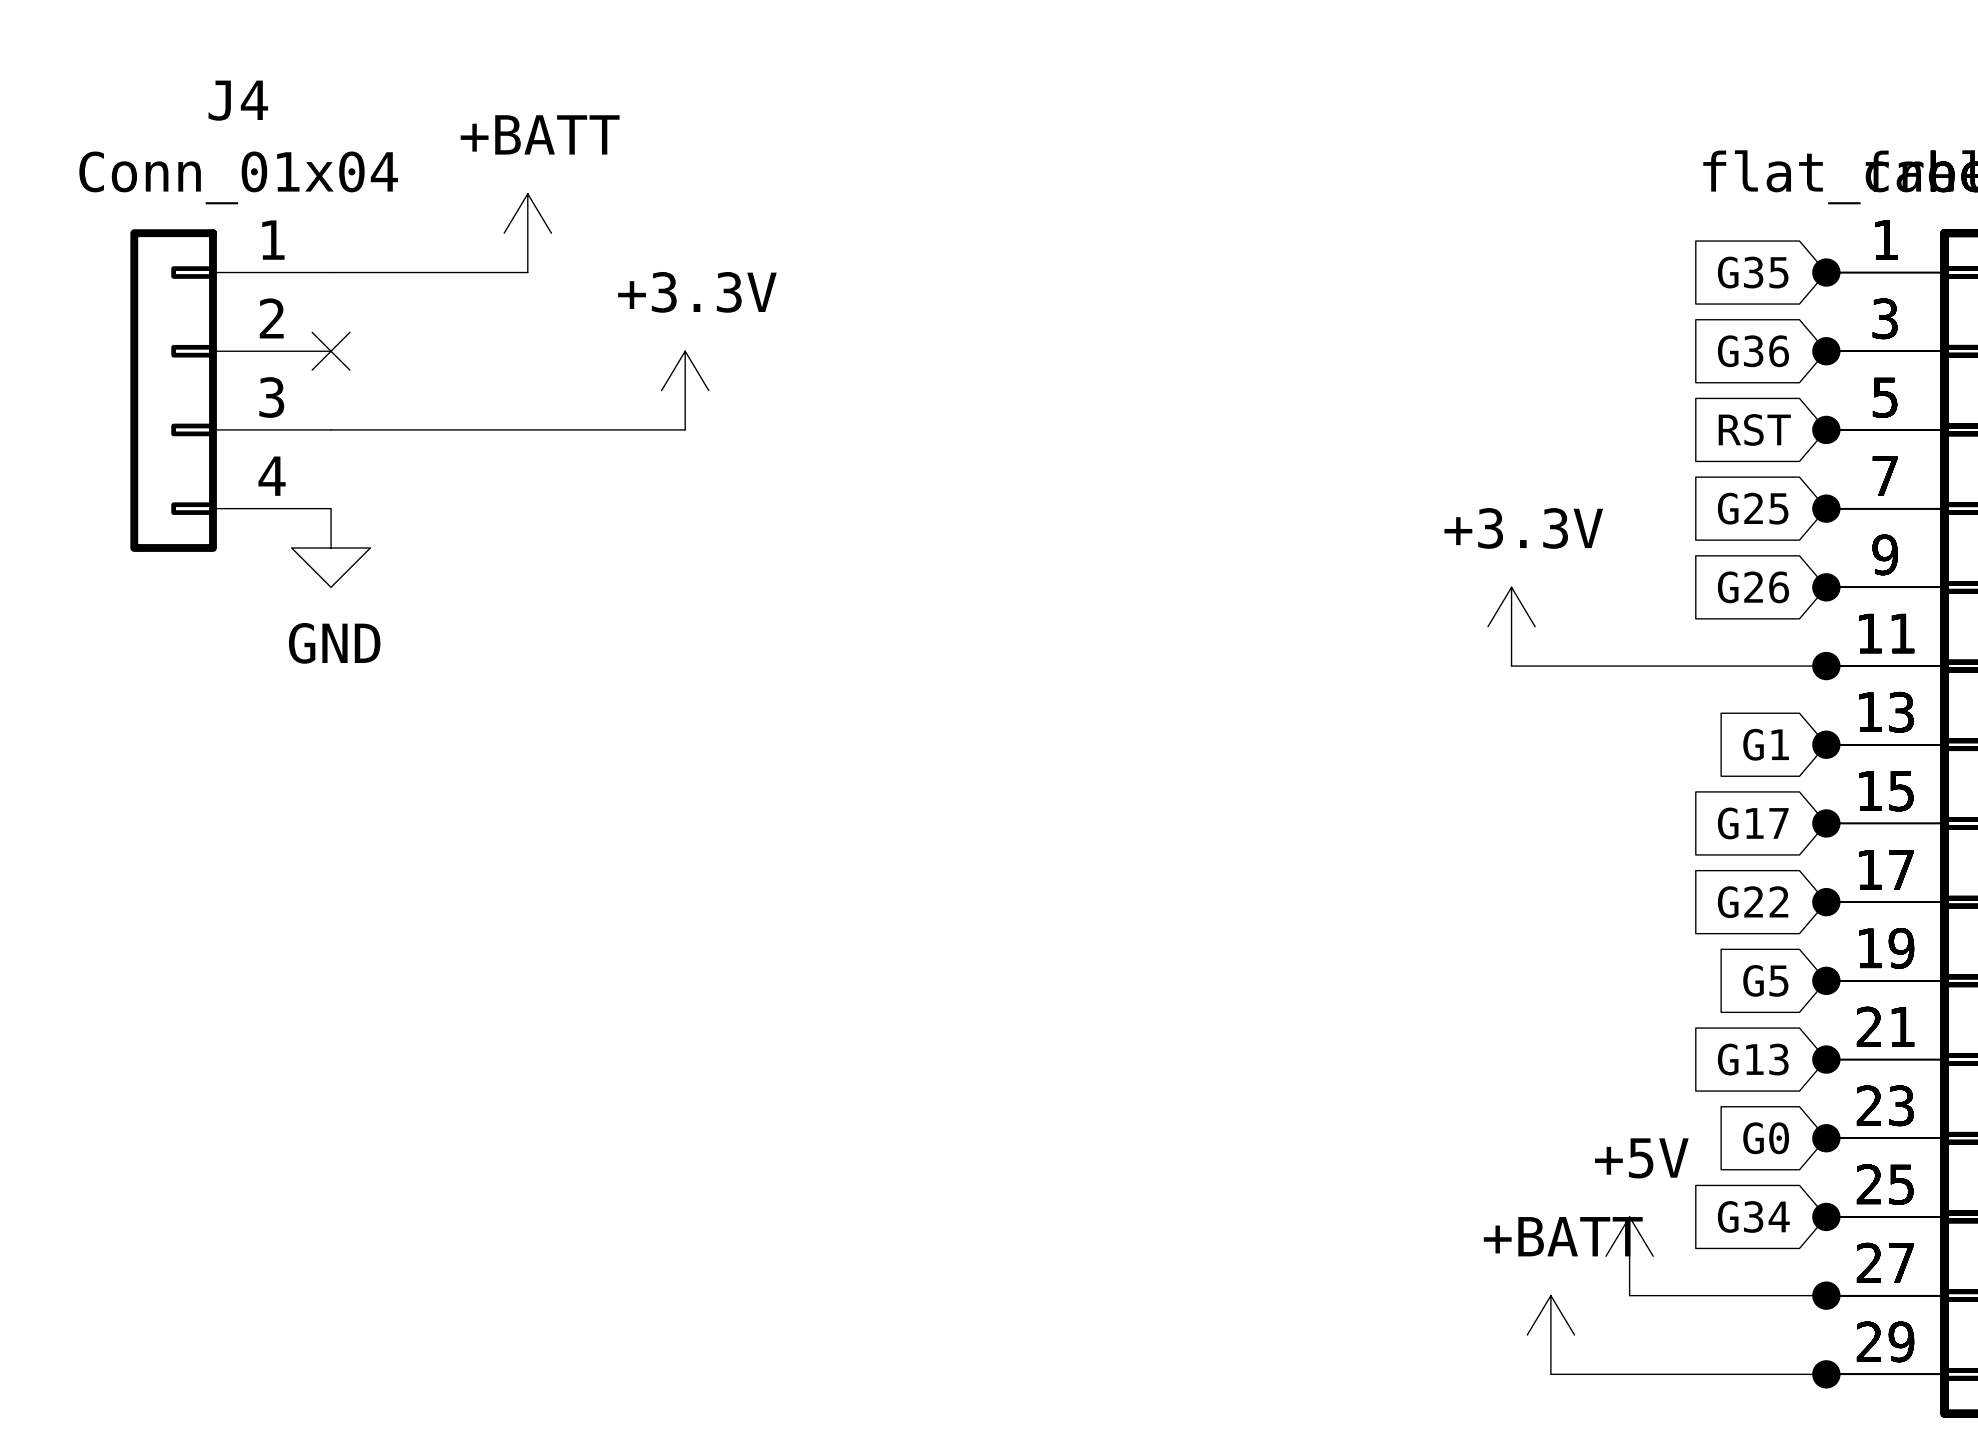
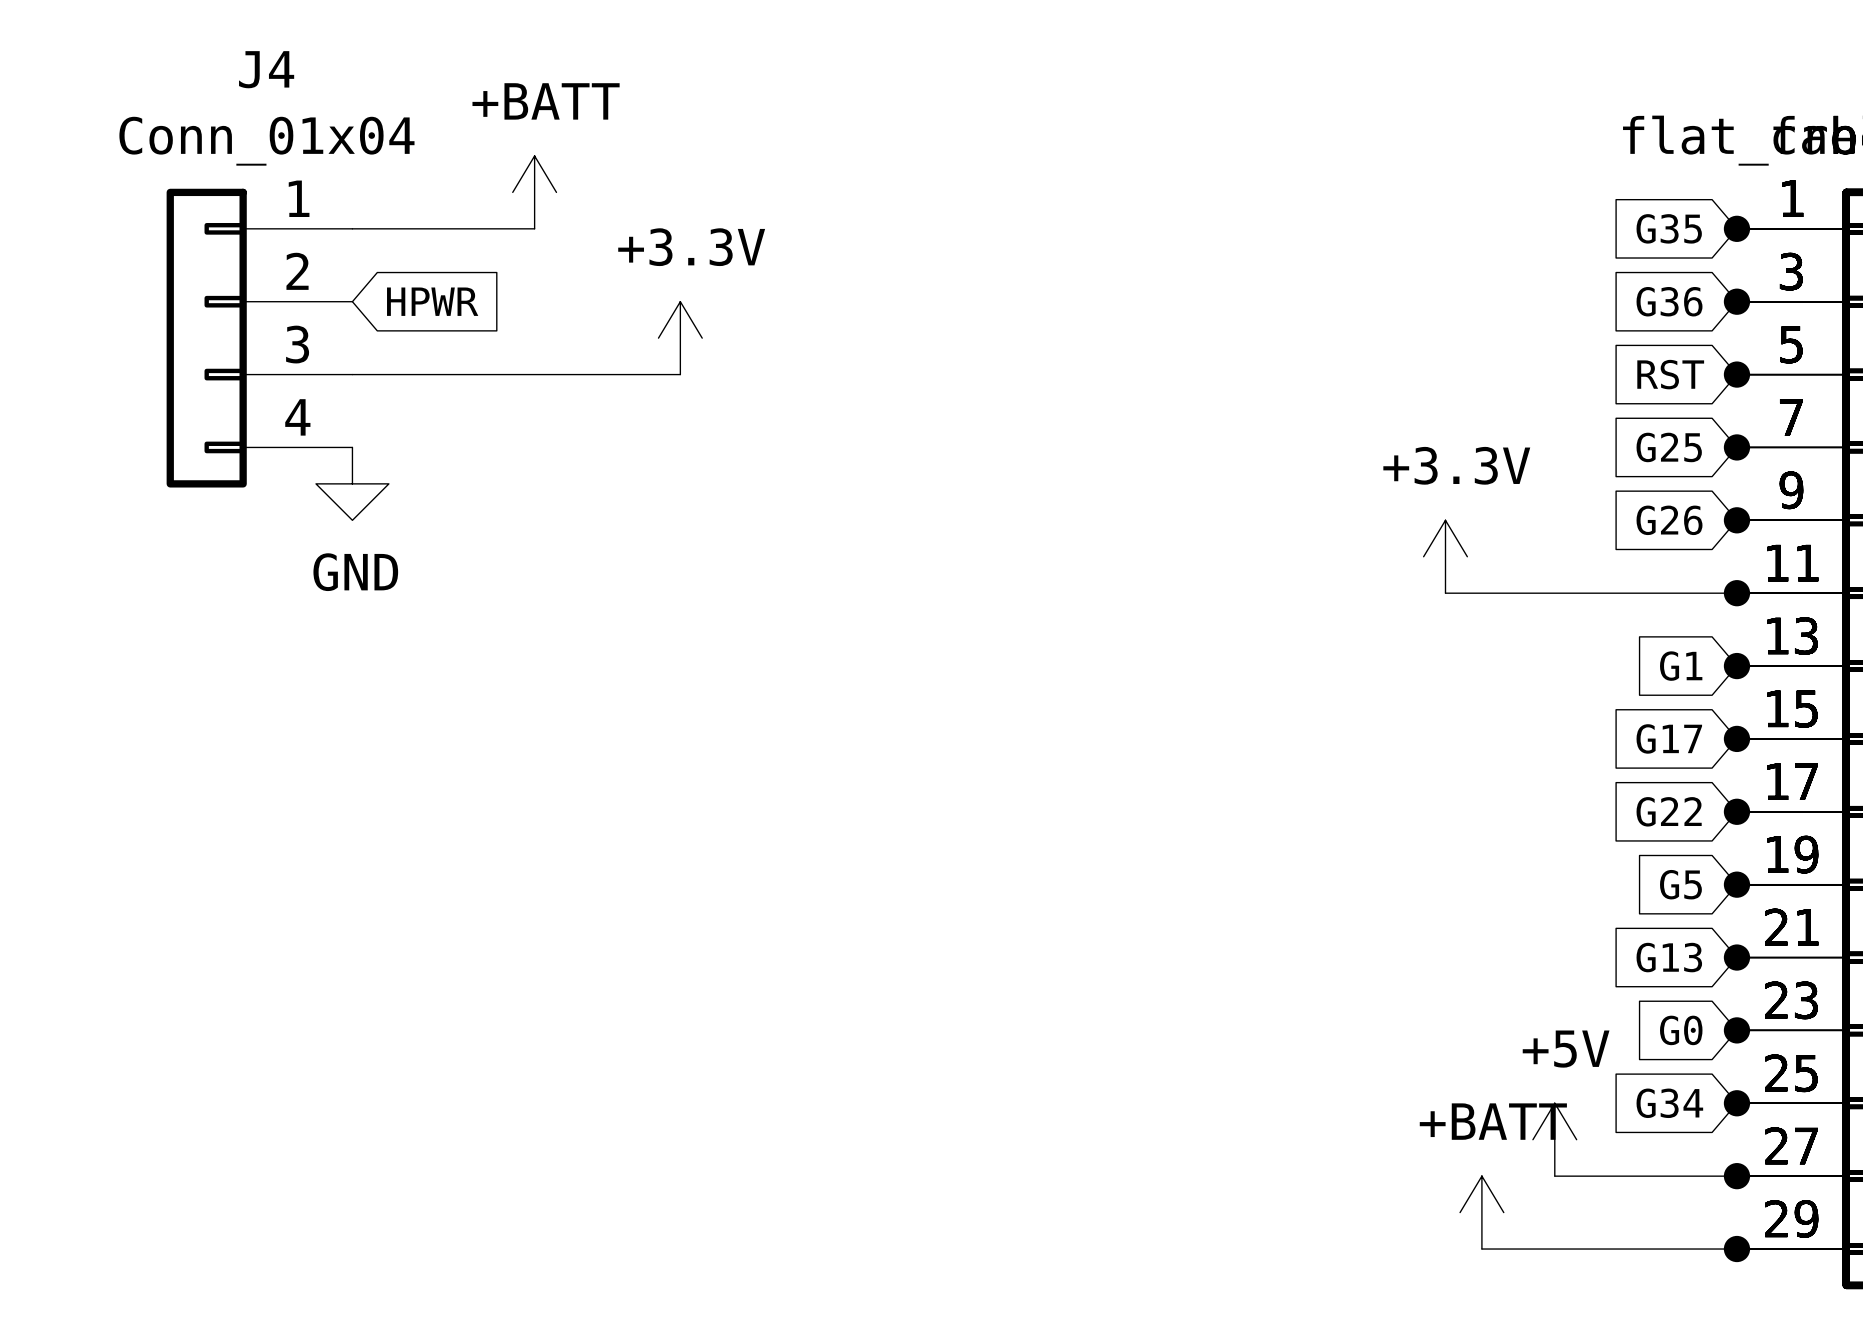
no-connect mark: (331, 351) -> none
global label: none -> HPWR (432, 301)

